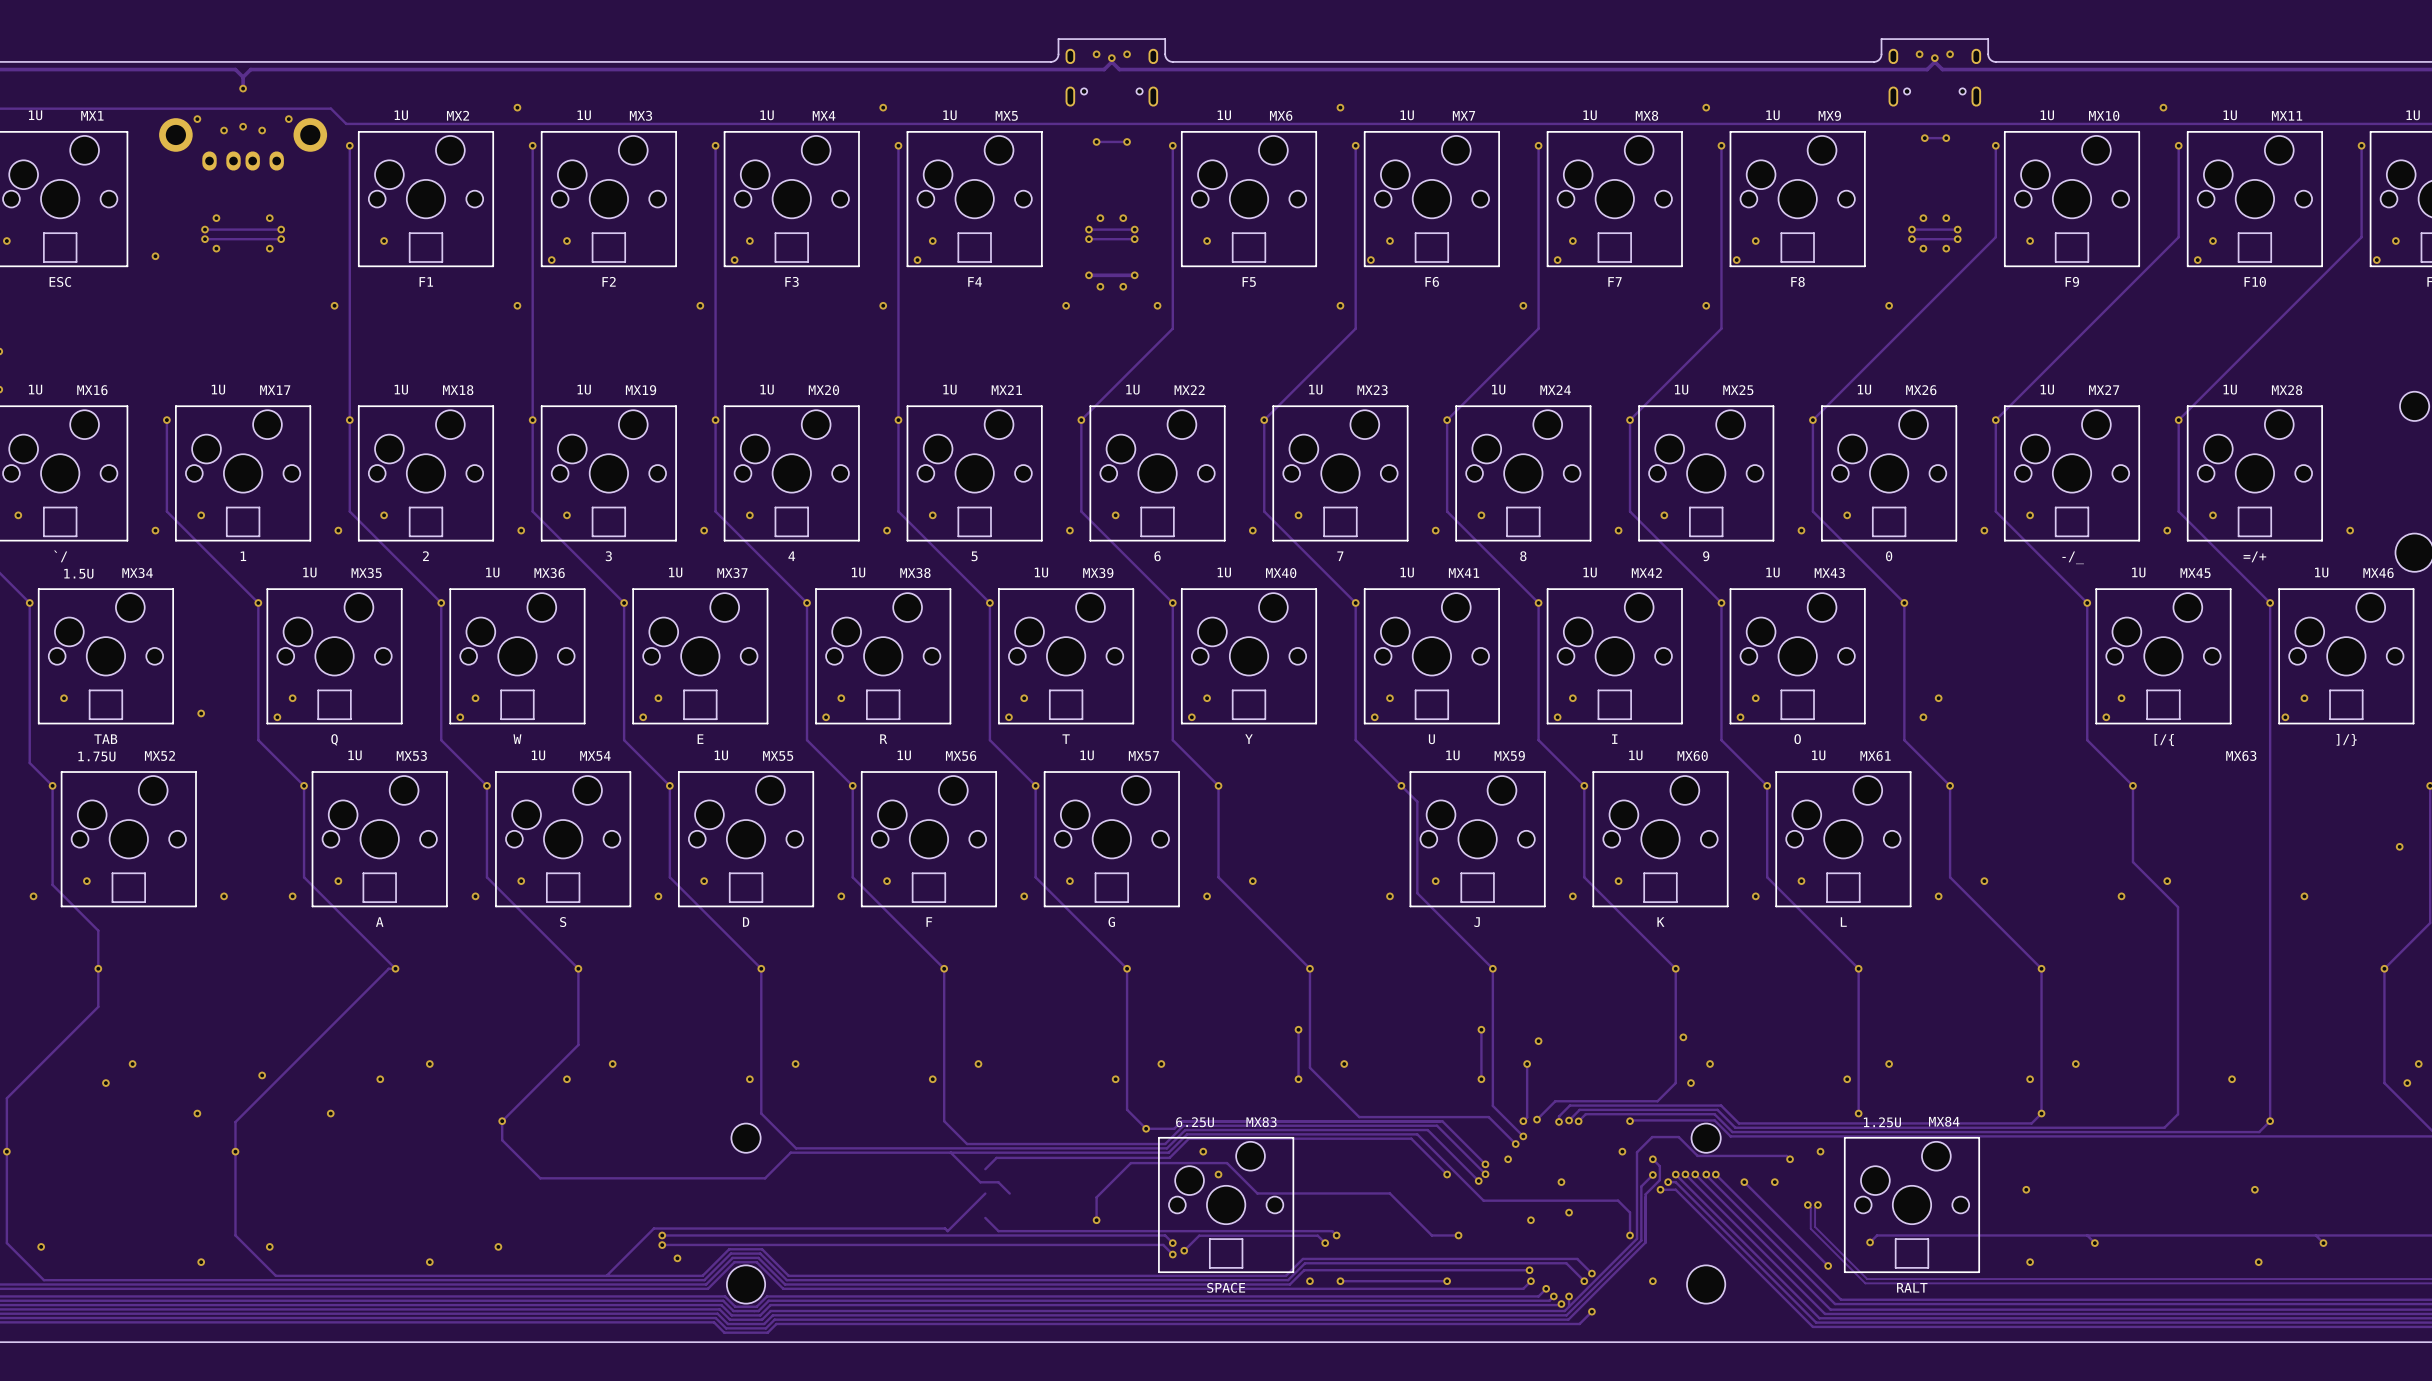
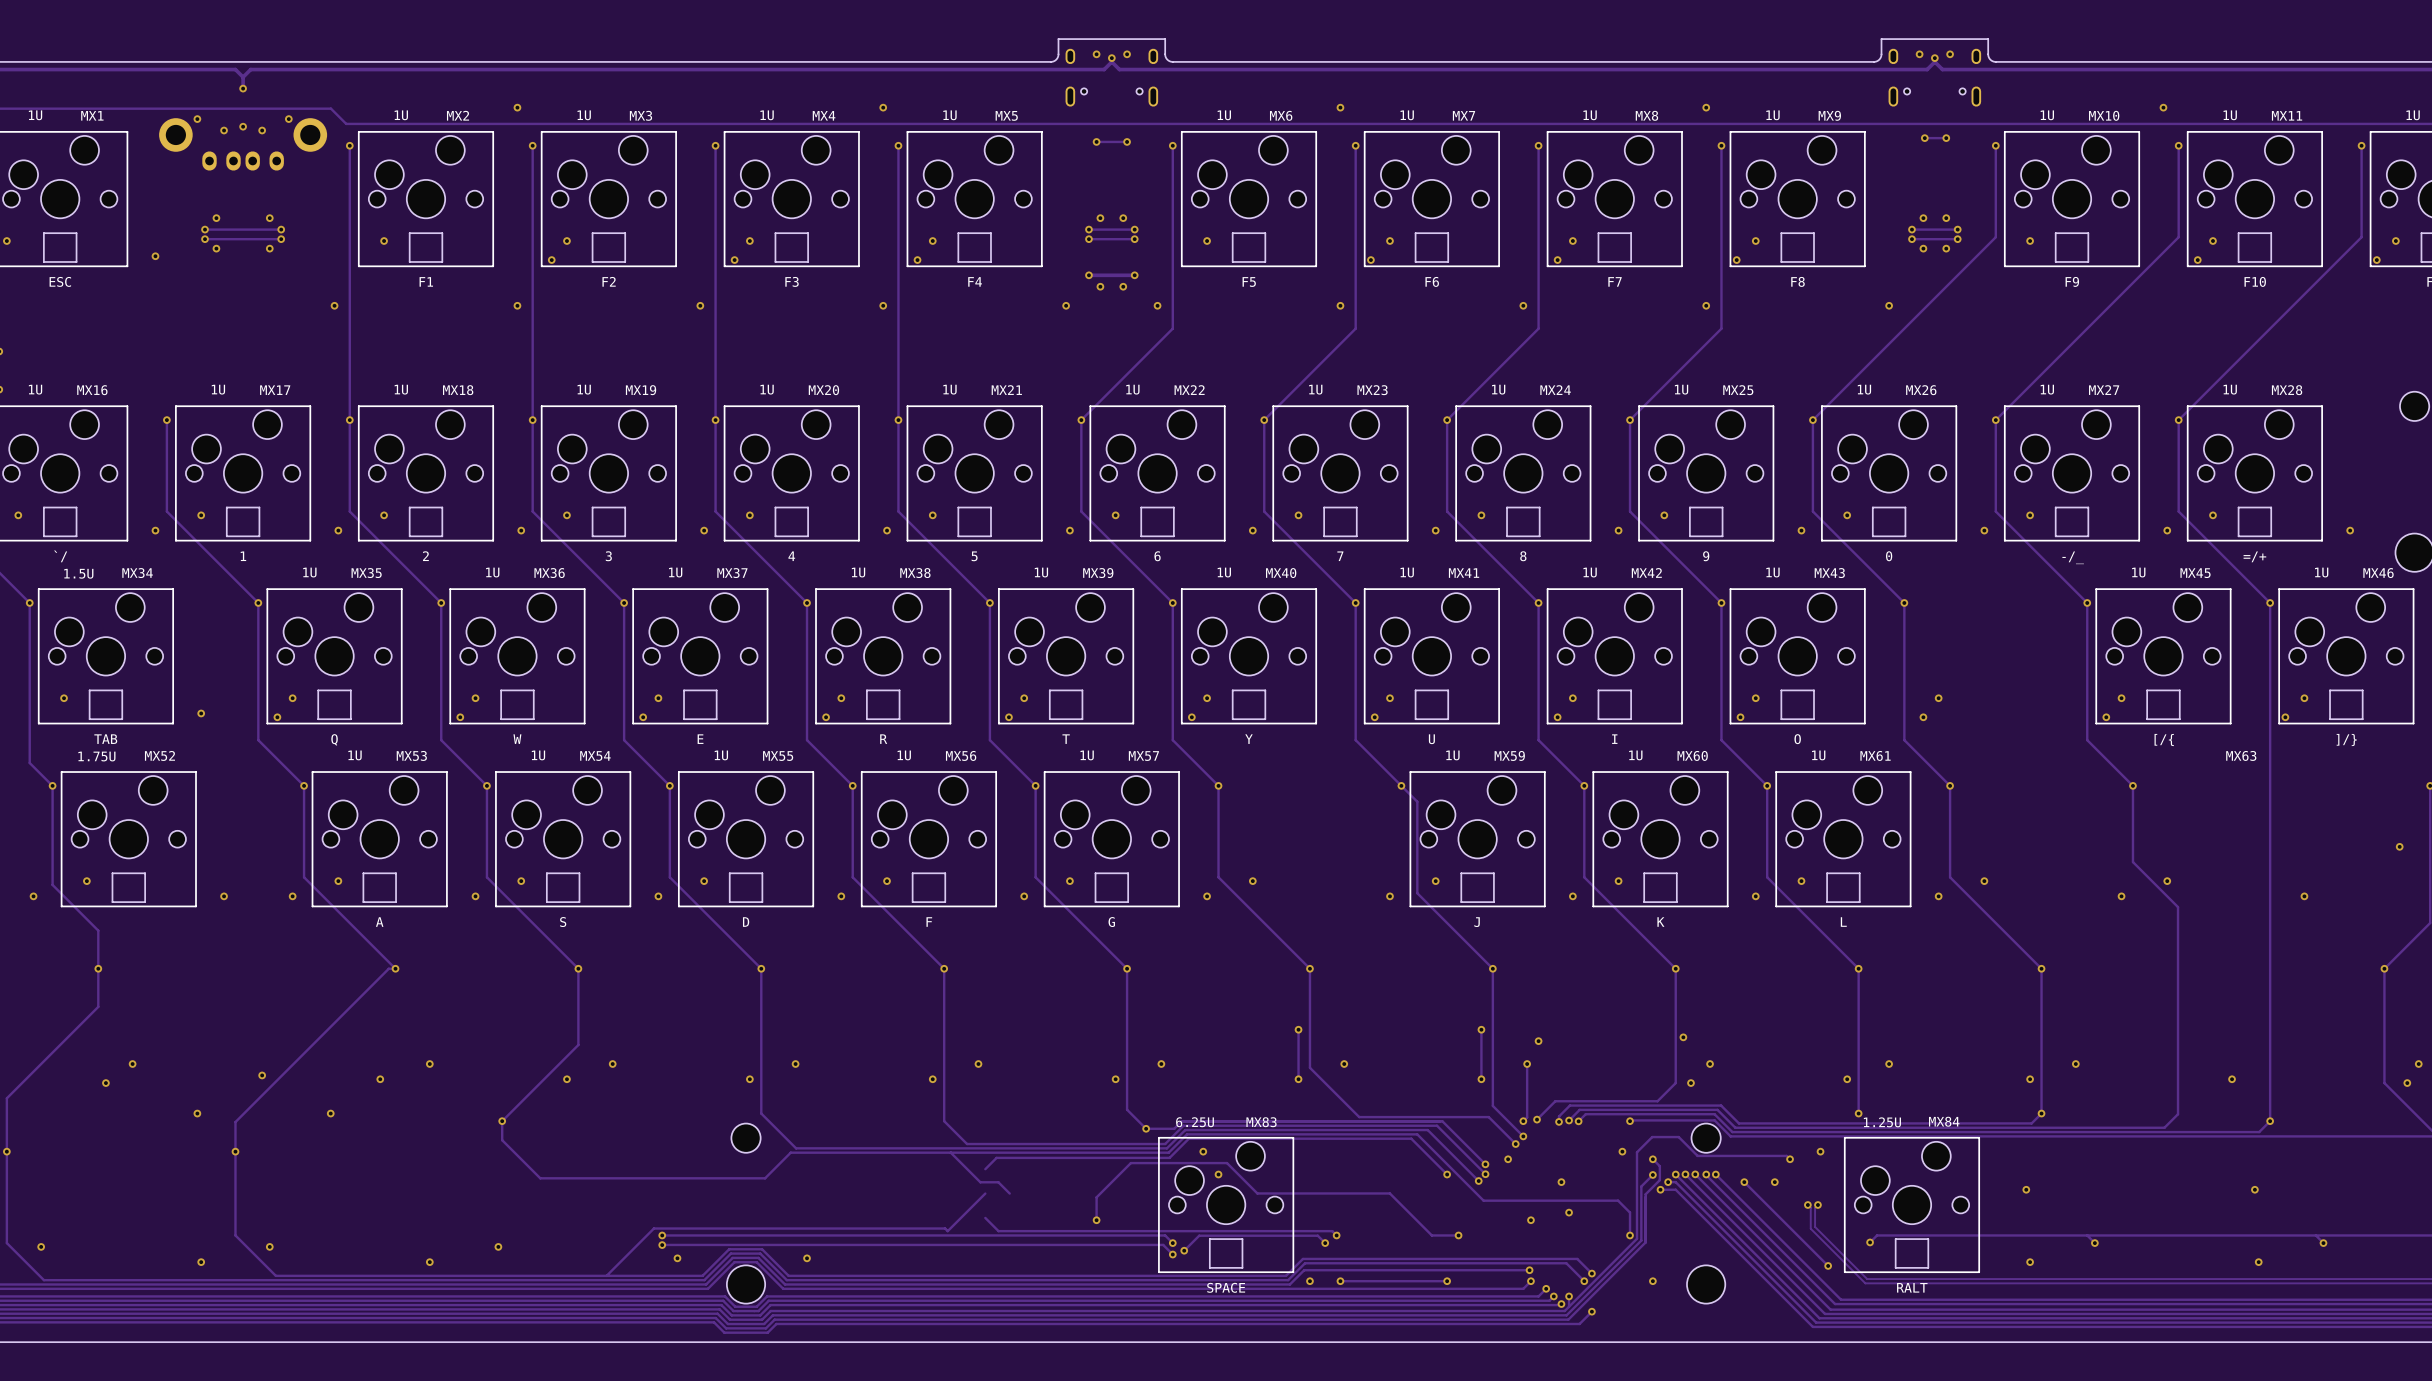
via: none -> (807, 1258)

